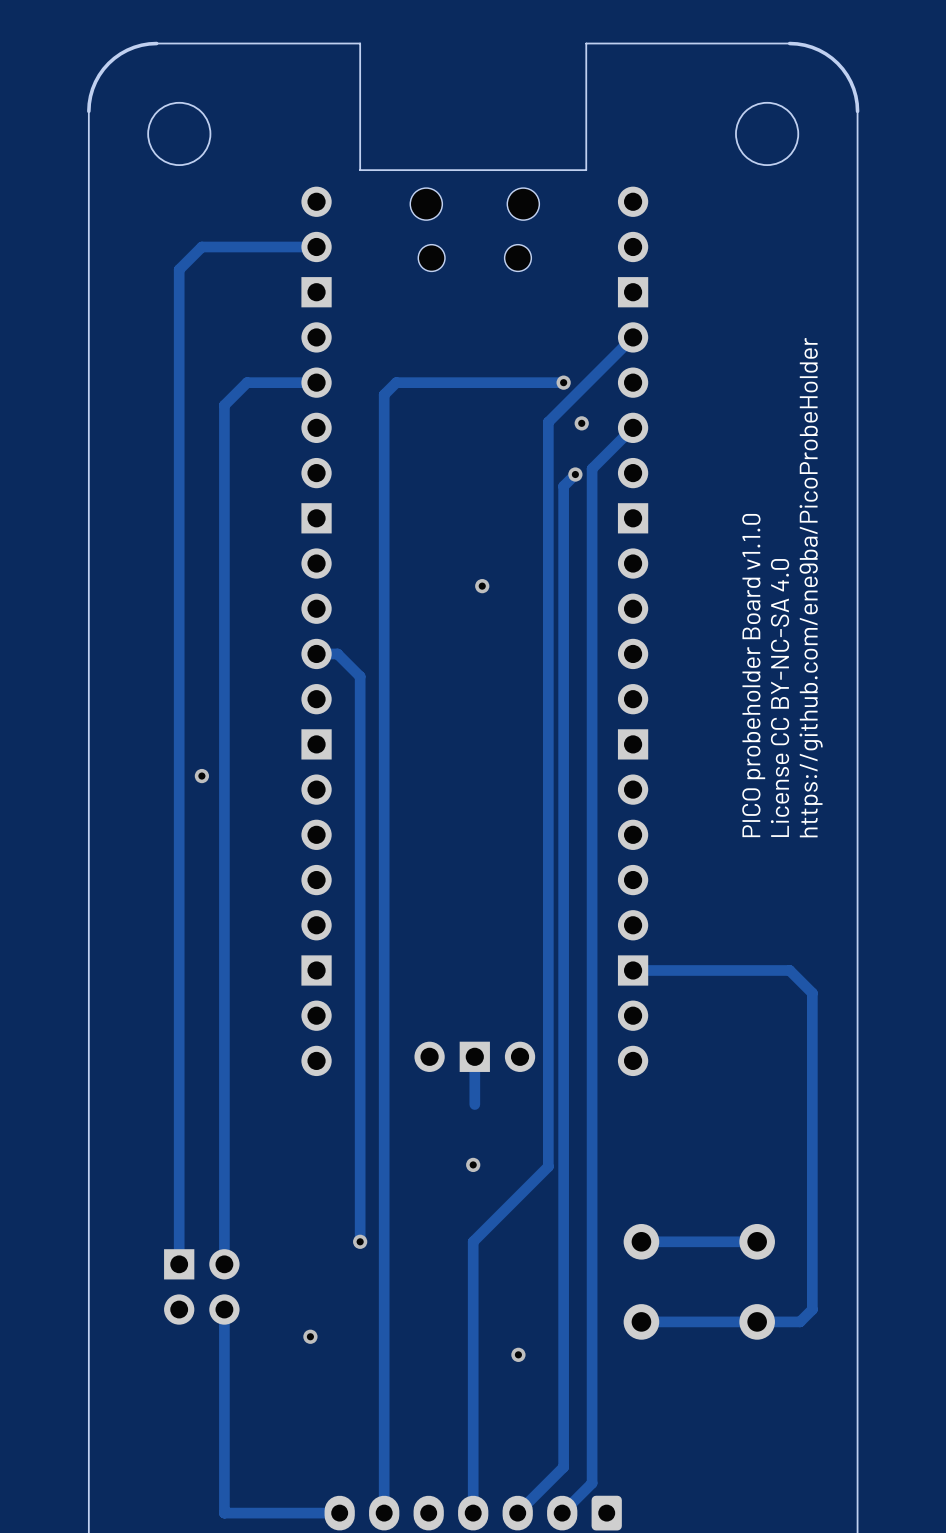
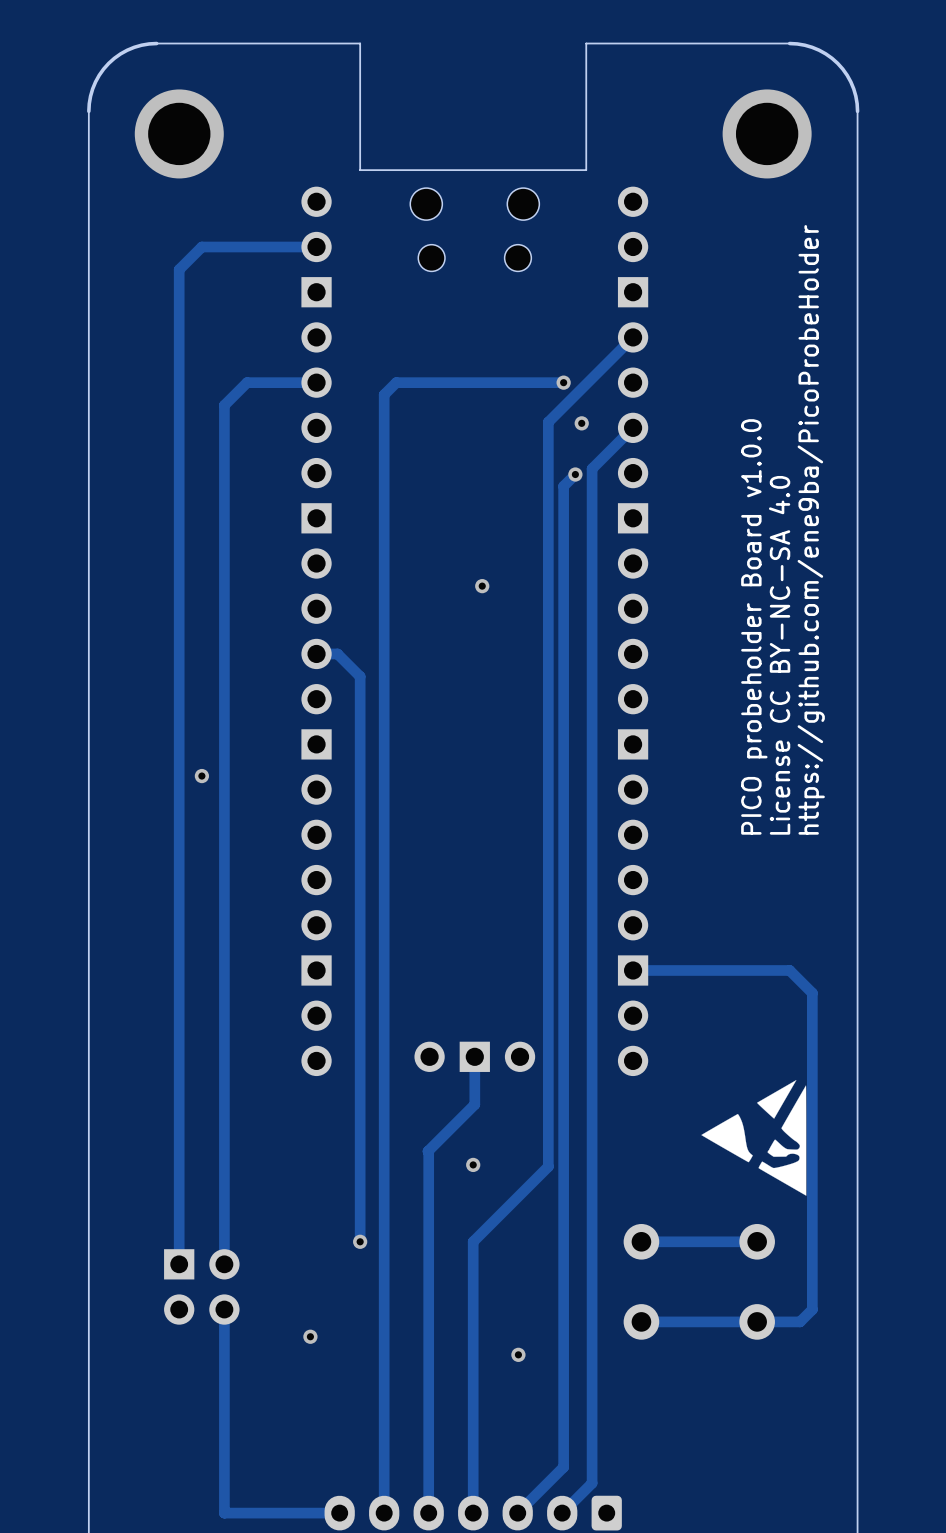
round board edge: [147, 101, 212, 166] -> none
round board edge: [735, 101, 800, 166] -> none
via: none -> (179, 133)
via: none -> (767, 133)
text: PICO probeholder Board v1.1.0 (753, 675) -> PICO probeholder Board v1.0.0 (754, 626)
drawing: none -> [701, 1080, 807, 1196]
track: none -> (474, 1104) (427, 1151) (428, 1513)

